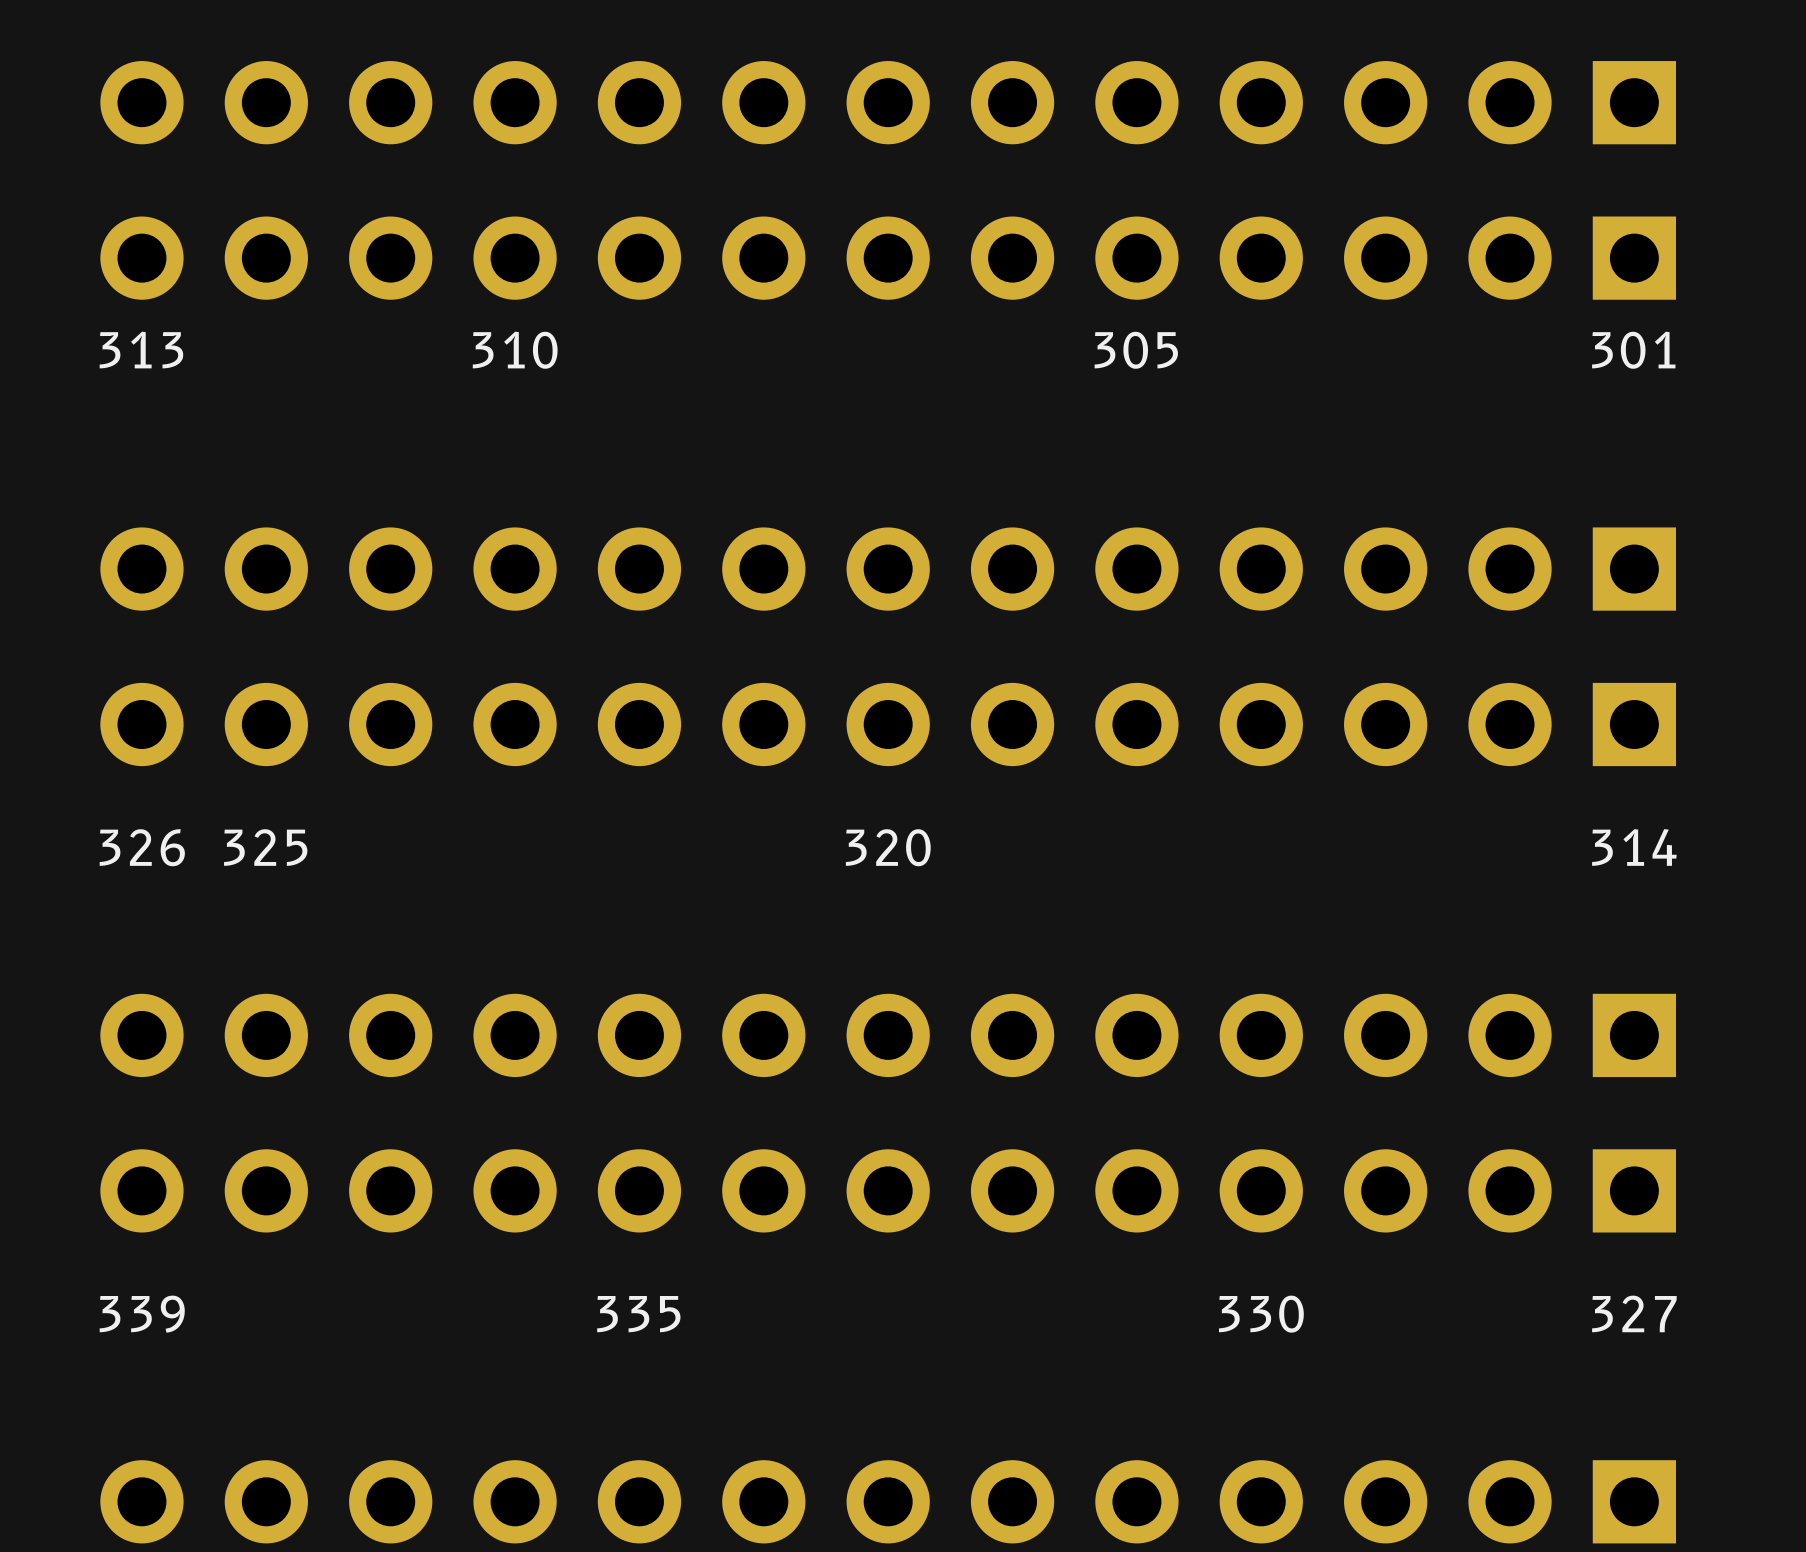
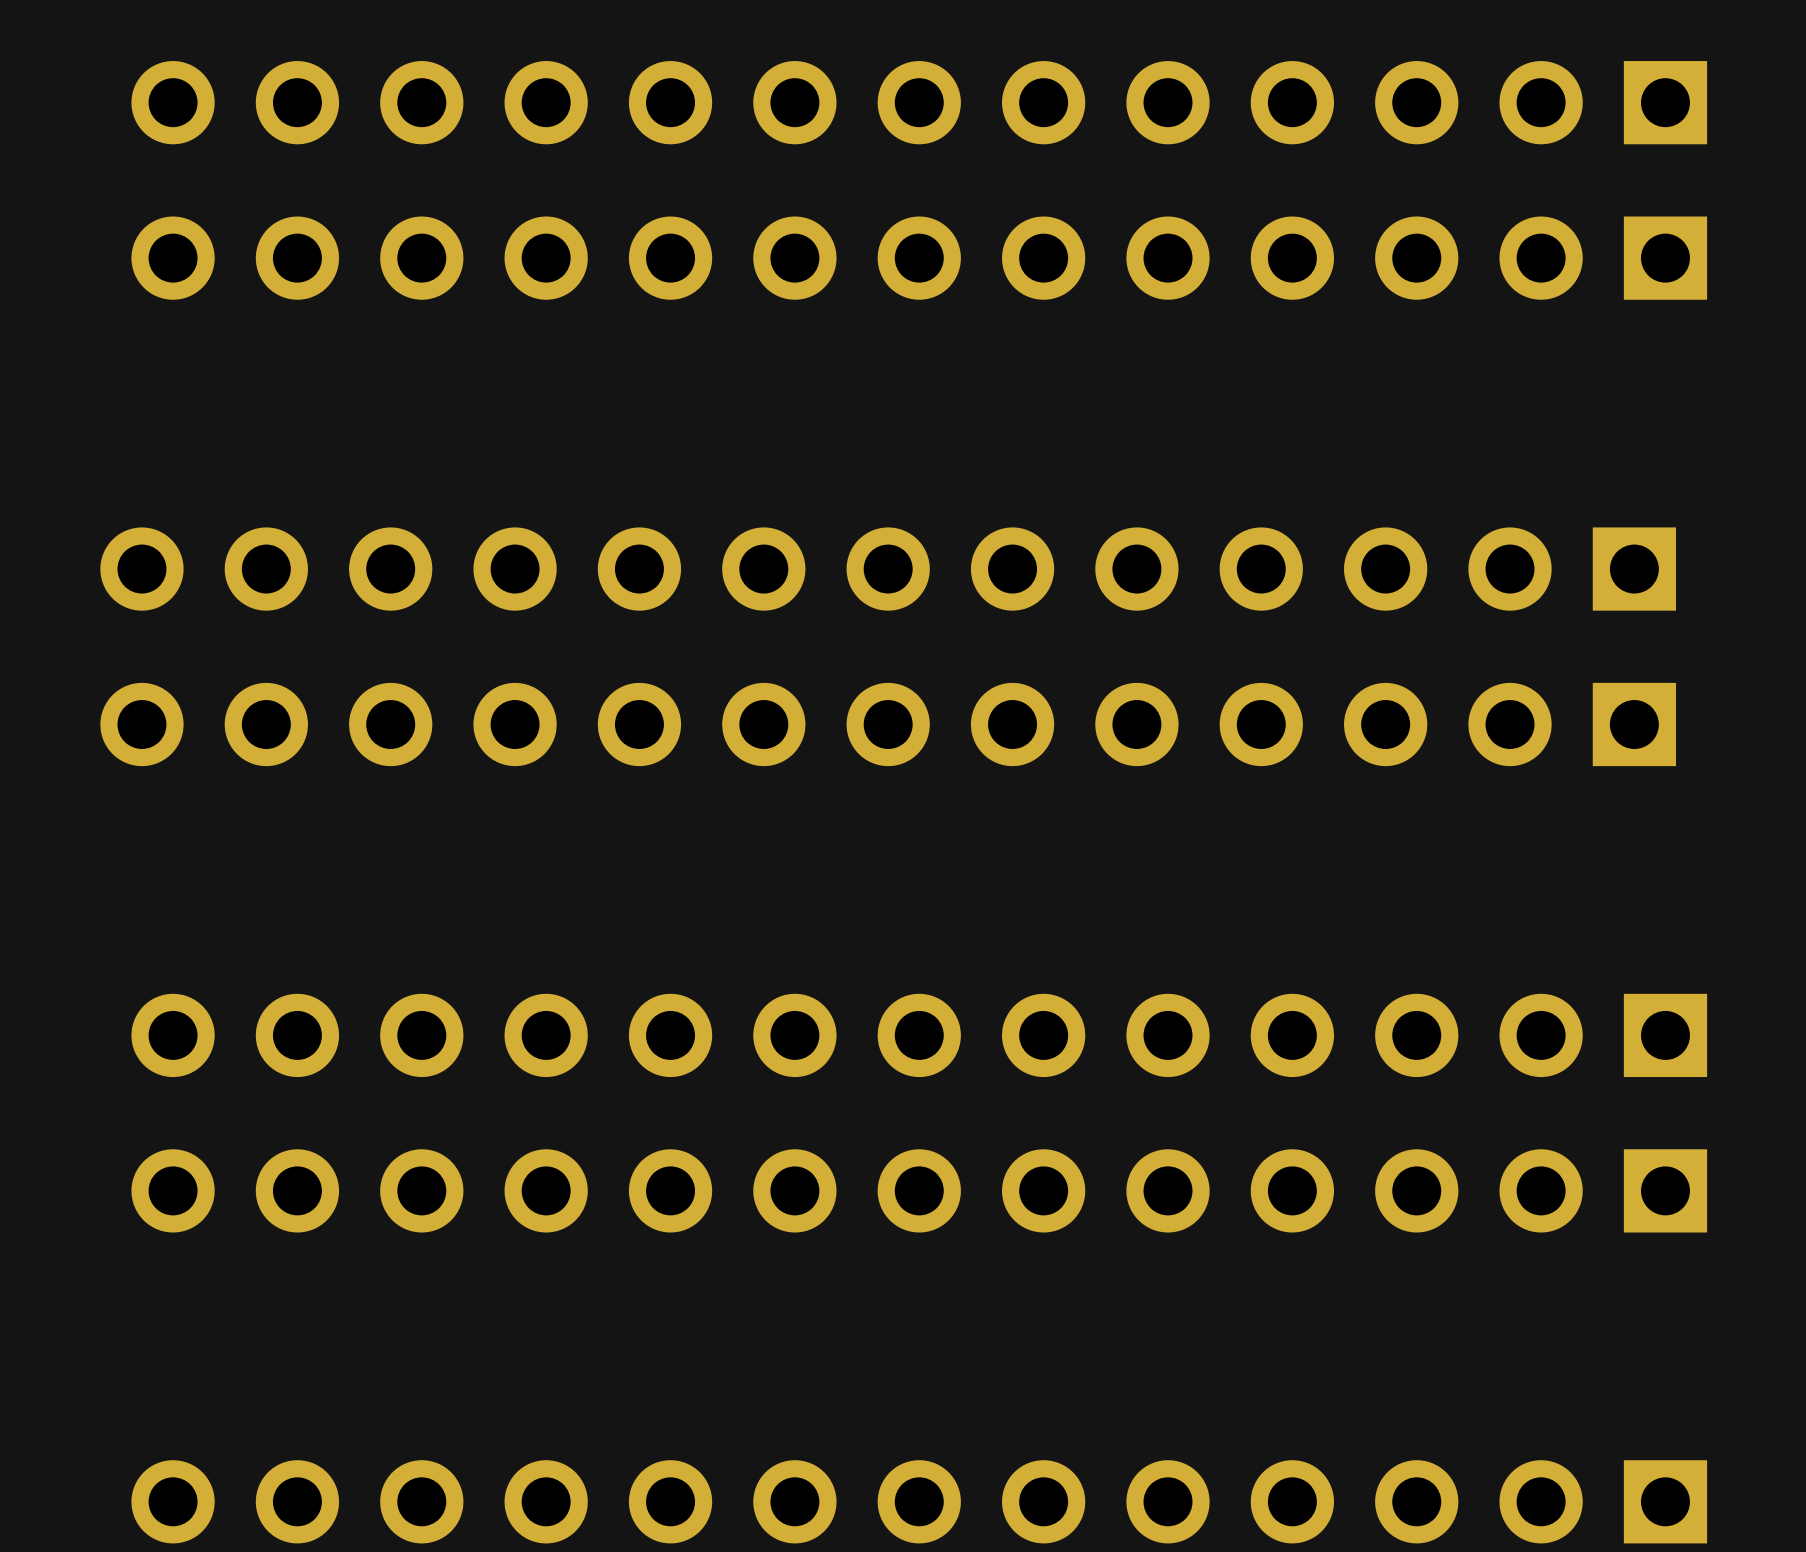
part position: (888, 102) -> (919, 102)
part position: (888, 258) -> (919, 258)
text: 313 (141, 350) -> none
text: 310 (515, 350) -> none
text: 305 (1136, 350) -> none
text: 301 (1633, 350) -> none
text: 326 (142, 847) -> none
text: 325 (265, 847) -> none
text: 320 (888, 847) -> none
text: 314 (1634, 847) -> none
part position: (888, 1035) -> (919, 1035)
part position: (888, 1190) -> (919, 1190)
text: 327 (1634, 1313) -> none
text: 339 (142, 1314) -> none
text: 335 (638, 1314) -> none
text: 330 (1261, 1314) -> none
part position: (888, 1501) -> (919, 1501)

